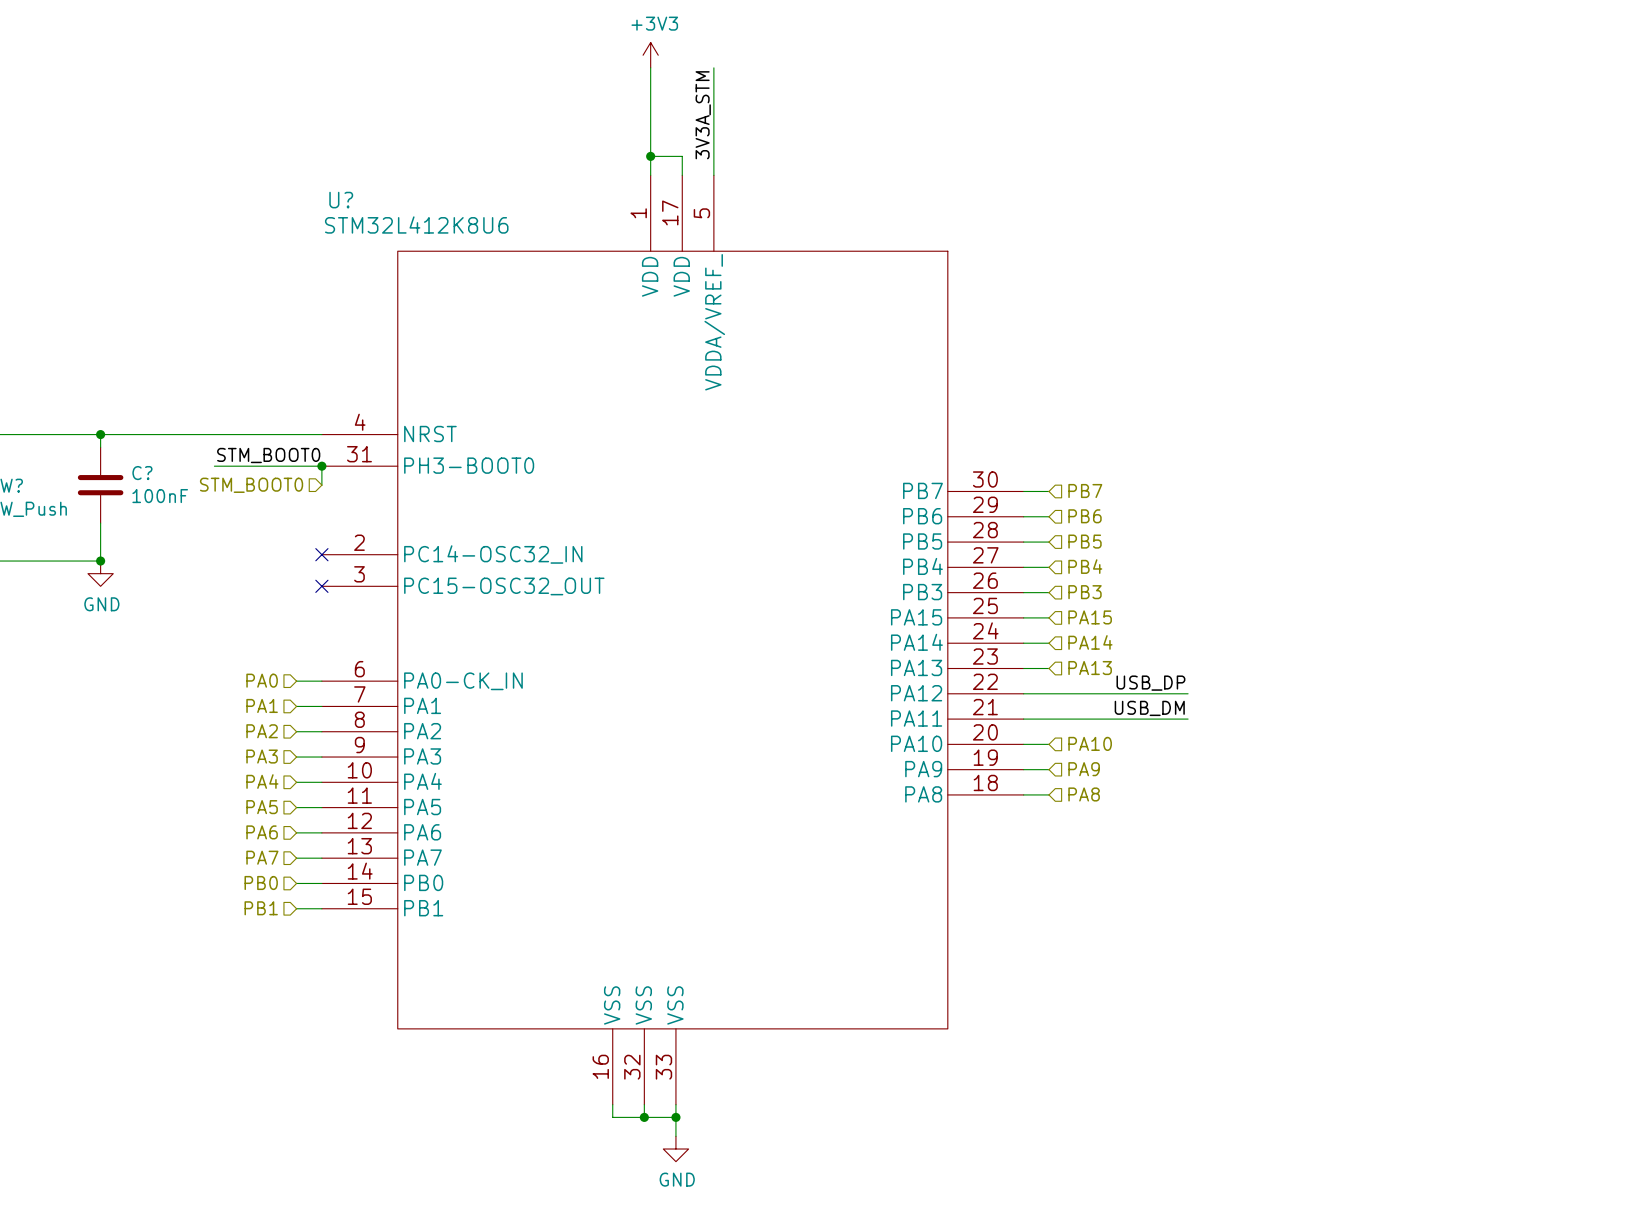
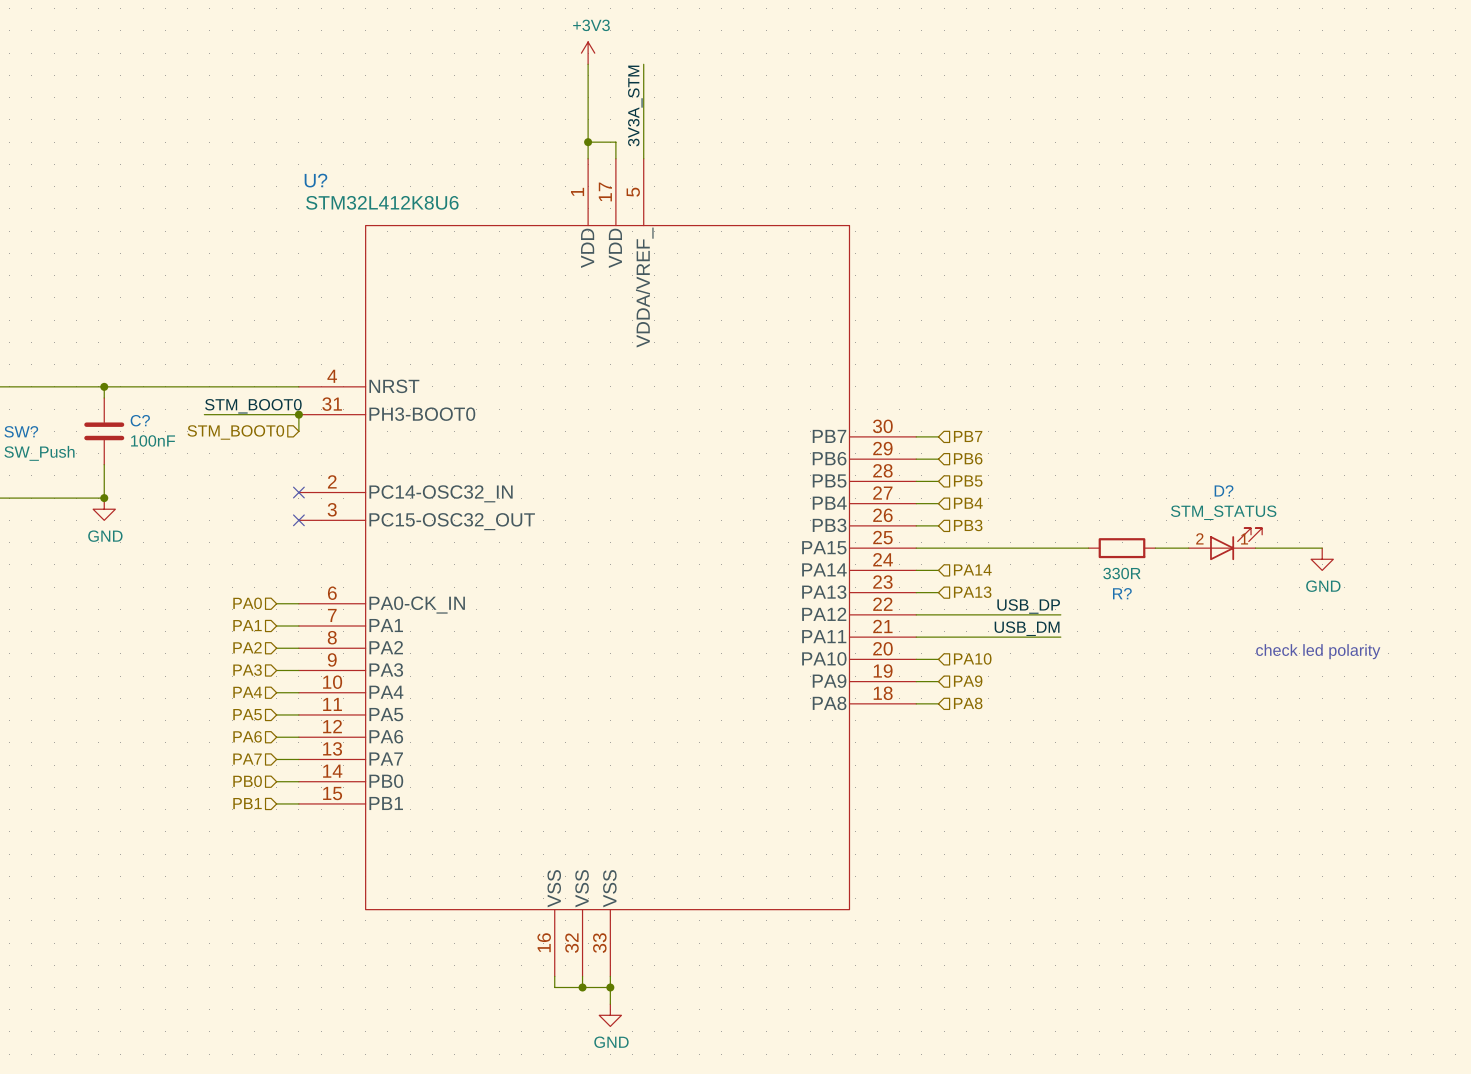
D?: none -> STM_STATUS (1225, 544)
wire: none -> (938, 548) (1088, 548)
hierarchical label: PA15 (1090, 617) -> none
R?: none -> 330R (1122, 548)
wire: none -> (1155, 548) (1188, 548)
wire: none -> (1255, 548) (1322, 548)
power symbol: none -> GND (1322, 559)
text: none -> check led polarity (1318, 651)

